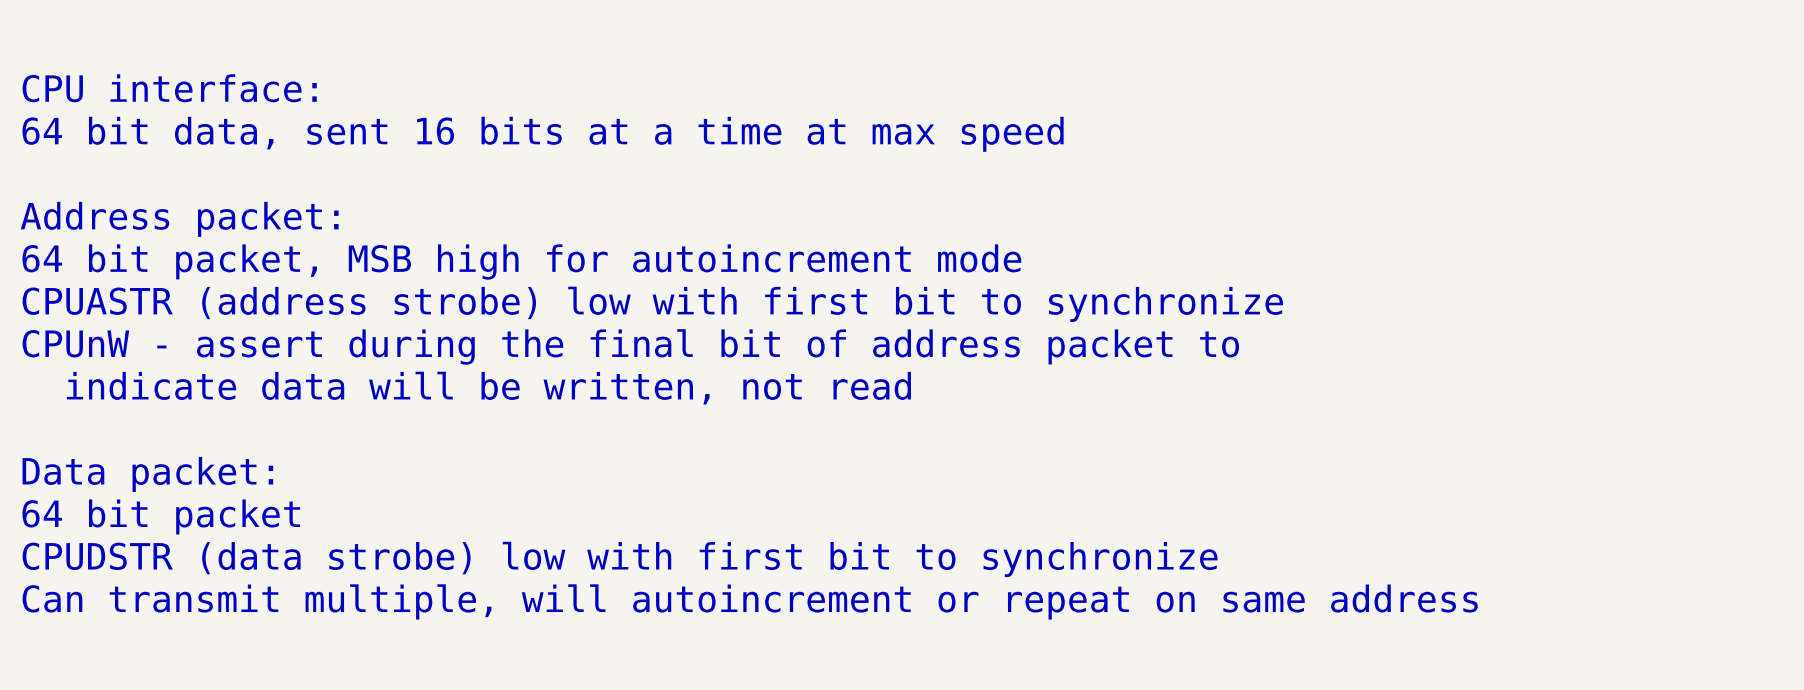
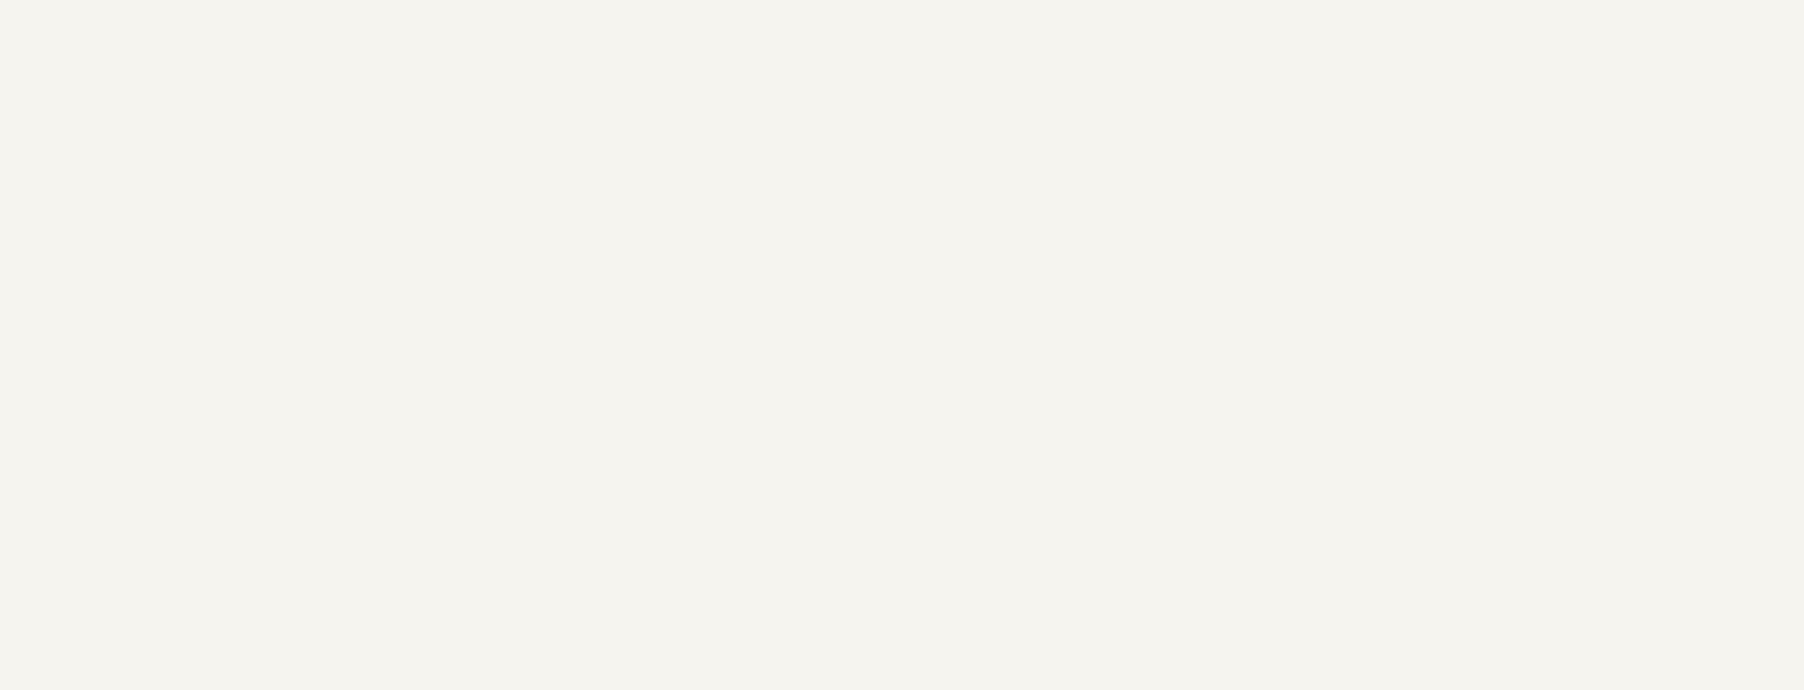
text: CPU interface: (169, 88) -> none
text: 64 bit data, sent 16 bits at a time at max speed (543, 134) -> none
text: Address packet: (179, 219) -> none
text: 64 bit packet, MSB high for autoincrement mode (521, 262) -> none
text: CPUASTR (address strobe) low with first bit to synchronize (652, 304) -> none
text: CPUnW - assert during the final bit of address packet to (630, 346) -> none
text: indicate data will be written, not read (488, 388) -> none
text: Data packet: (147, 474) -> none
text: 64 bit packet (161, 517) -> none
text: CPUDSTR (data strobe) low with first bit to synchronize (620, 559) -> none
text: Can transmit multiple, will autoincrement or repeat on same address (750, 601) -> none

